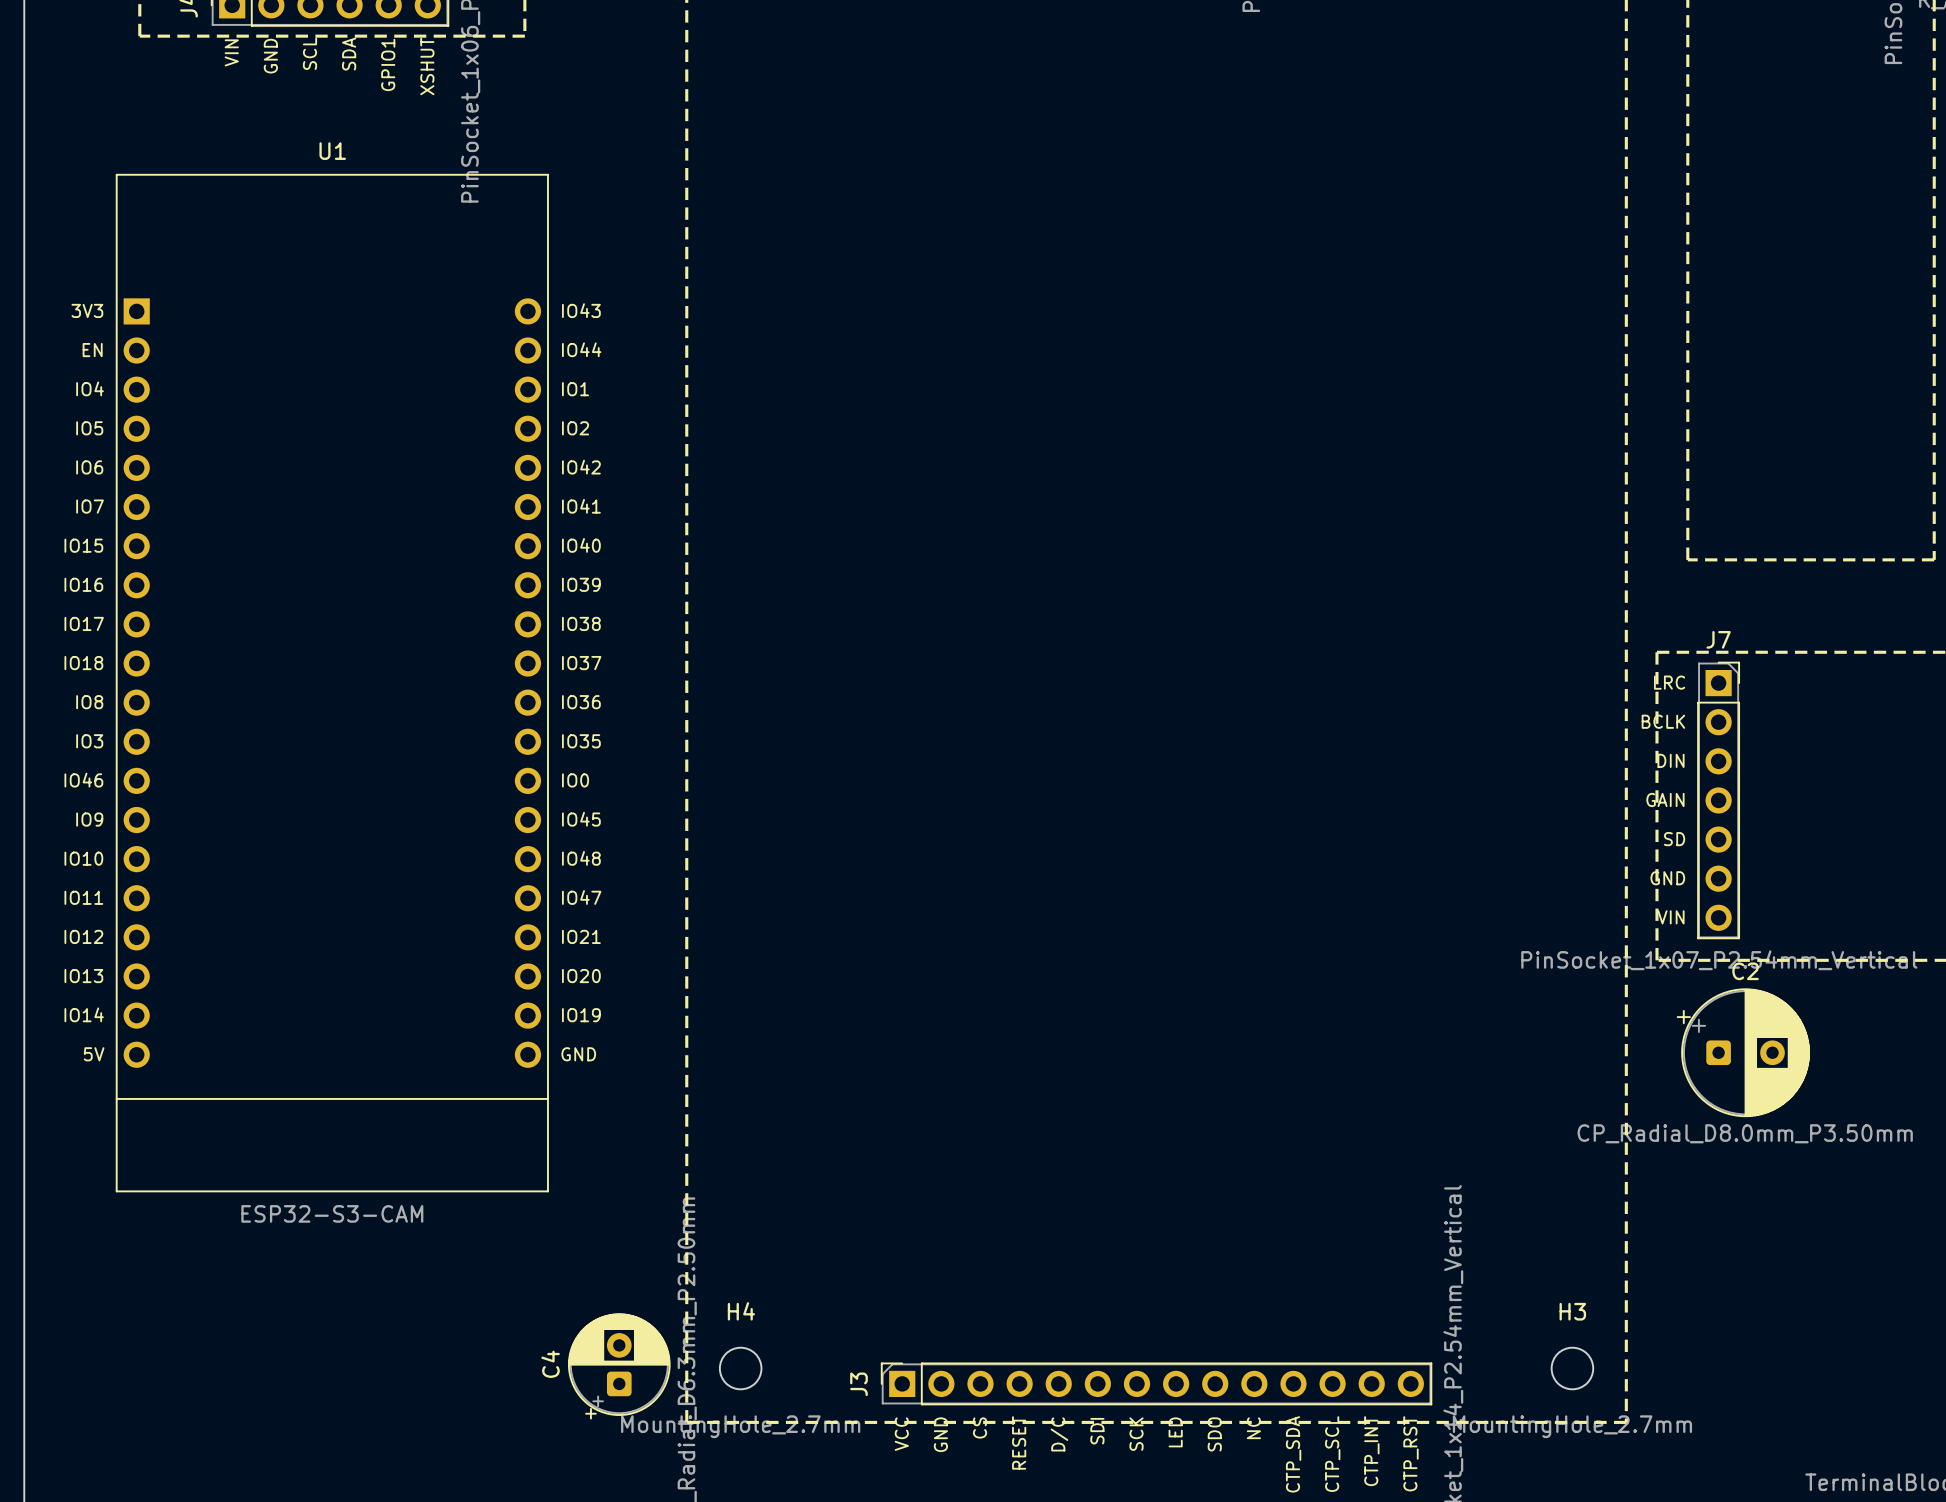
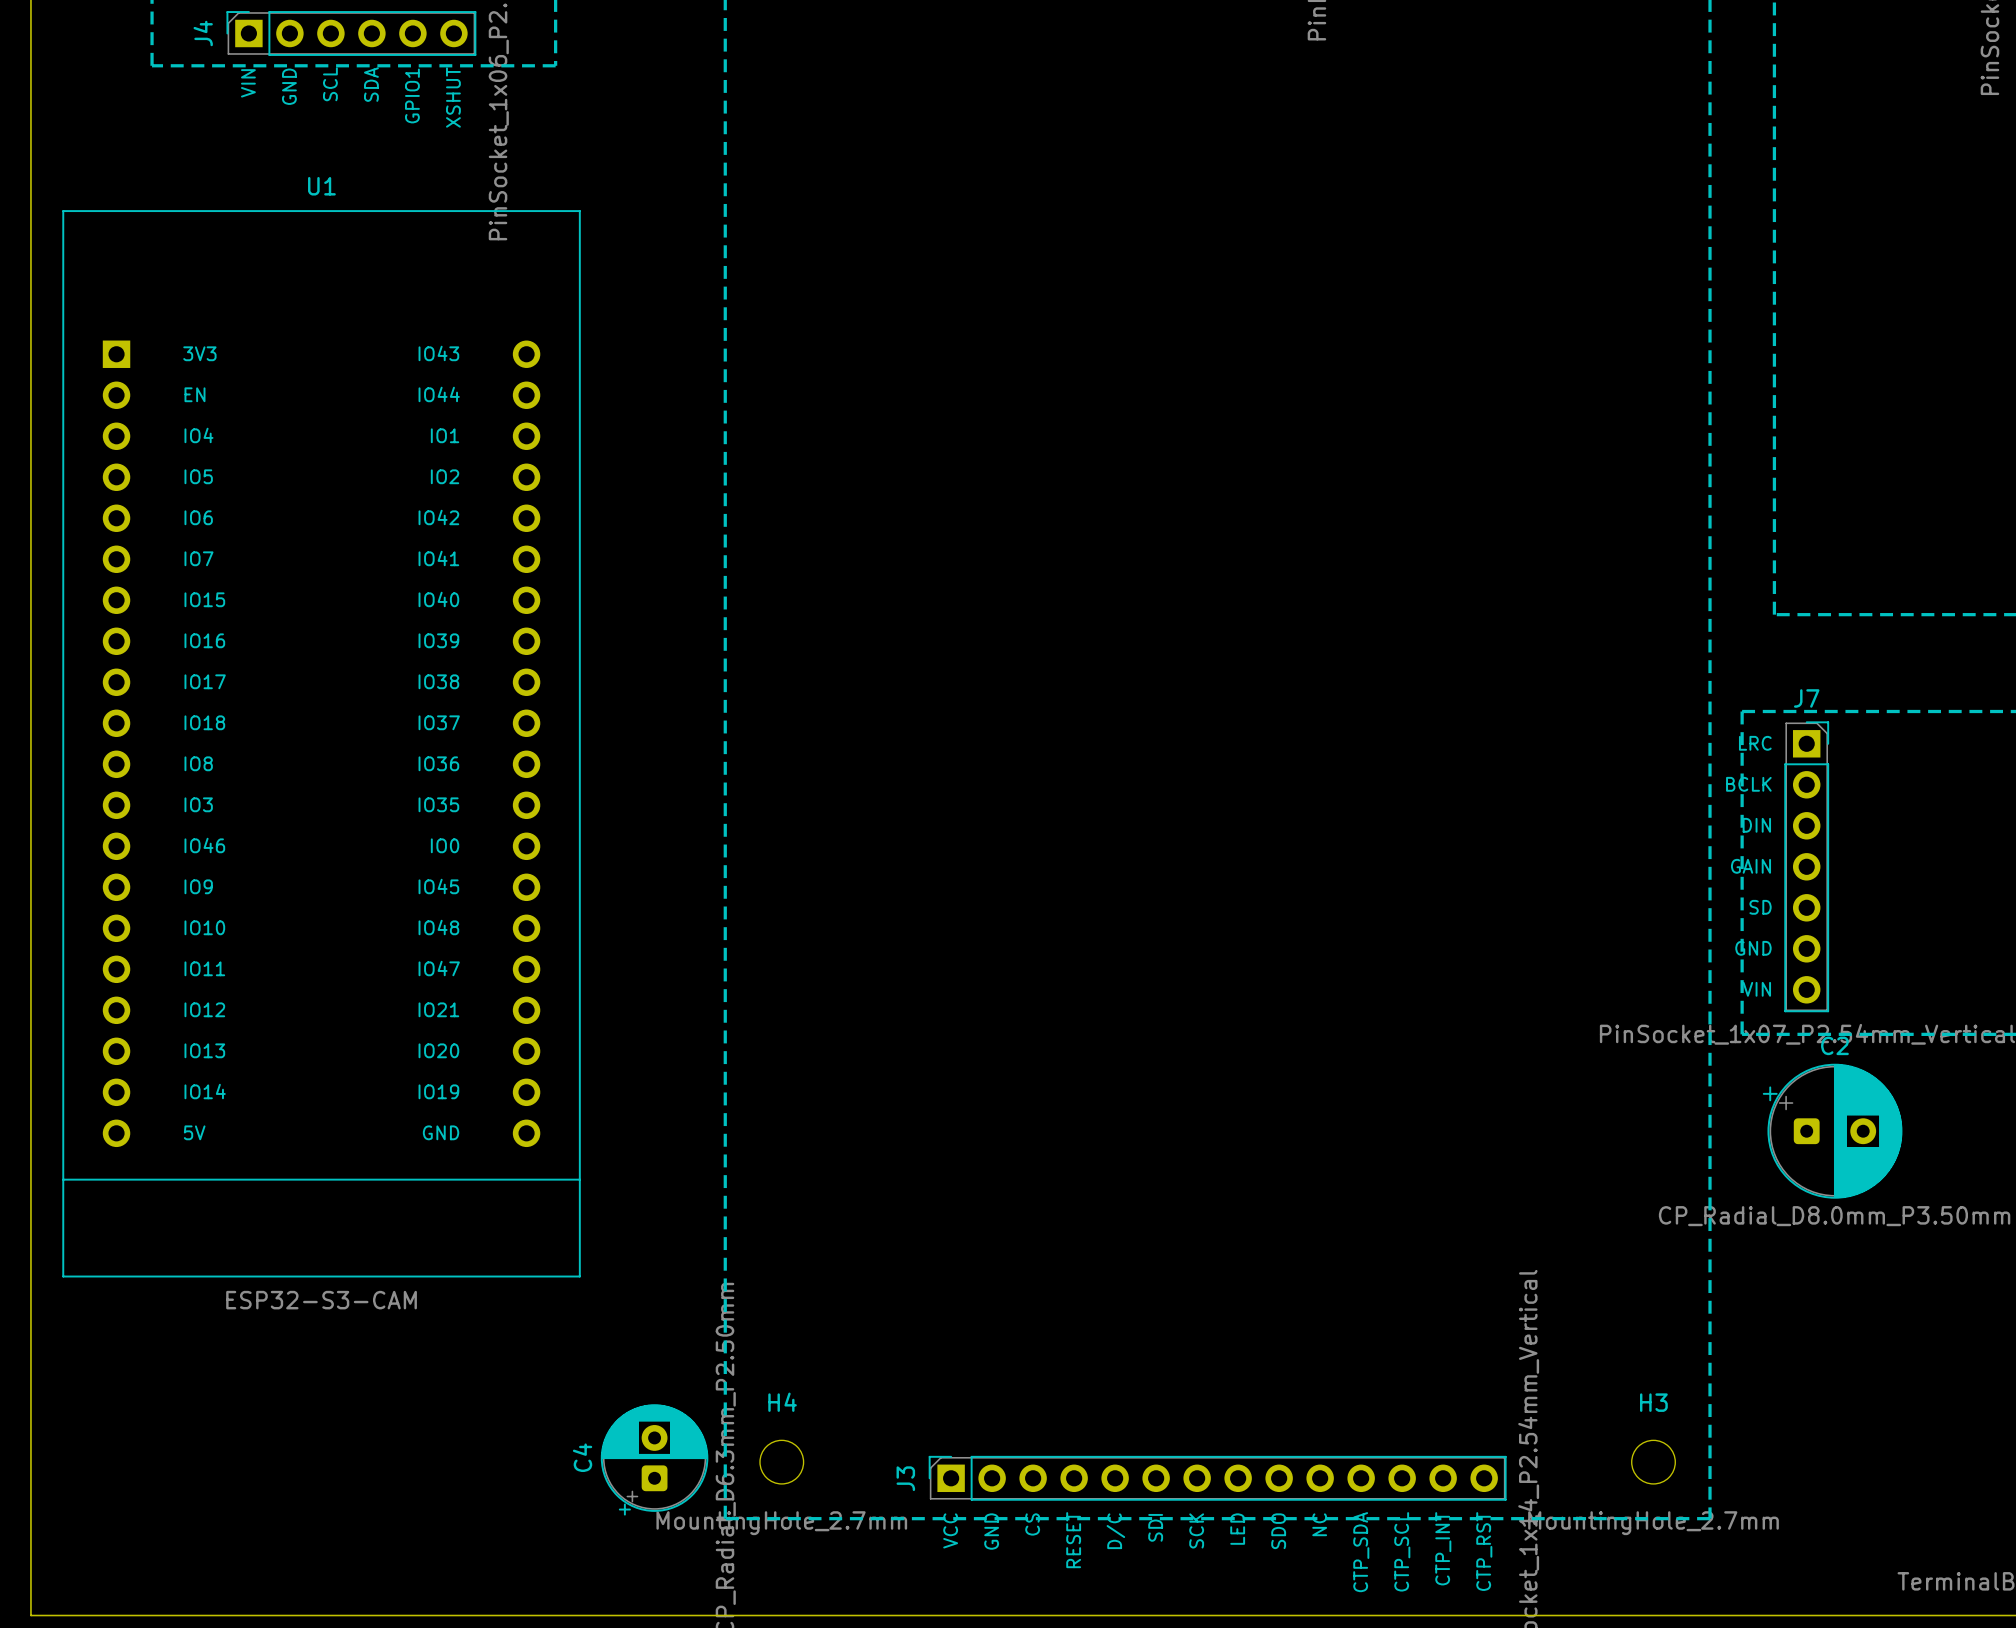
U1 footprint: [115, 173, 549, 1193] -> [62, 210, 581, 1278]
text position: 3V3 (87, 310) -> 3V3 (199, 353)
text position: IO43 (581, 310) -> IO43 (438, 353)
text position: IO44 (581, 349) -> IO44 (439, 394)
text position: EN (92, 350) -> EN (194, 394)
text position: IO4 (90, 388) -> IO4 (198, 435)
text position: IO1 (575, 389) -> IO1 (445, 435)
text position: IO5 (89, 428) -> IO5 (198, 476)
text position: IO2 (575, 428) -> IO2 (445, 476)
text position: IO6 (89, 467) -> IO6 (198, 517)
text position: IO42 (581, 467) -> IO42 (438, 517)
text position: IO7 (90, 506) -> IO7 (198, 558)
text position: IO41 (581, 506) -> IO41 (438, 558)
text position: IO15 (83, 545) -> IO15 (204, 599)
text position: IO40 (581, 545) -> IO40 (438, 599)
text position: IO16 (83, 584) -> IO16 (204, 640)
text position: IO39 (581, 584) -> IO39 (438, 640)
text position: IO17 (84, 623) -> IO17 (205, 681)
text position: IO38 (581, 623) -> IO38 (438, 681)
text position: IO18 (83, 663) -> IO18 (204, 722)
text position: IO37 (581, 663) -> IO37 (439, 722)
text position: IO8 (89, 702) -> IO8 (198, 763)
text position: IO36 (581, 702) -> IO36 (438, 763)
text position: IO3 (89, 741) -> IO3 (198, 804)
text position: IO35 (581, 741) -> IO35 (438, 804)
text position: IO46 (83, 780) -> IO46 (204, 845)
text position: IO0 (575, 780) -> IO0 (445, 845)
text position: IO9 (89, 819) -> IO9 (198, 886)
text position: IO45 (581, 819) -> IO45 (438, 886)
text position: IO10 (83, 858) -> IO10 (204, 927)
text position: IO48 (581, 858) -> IO48 (438, 927)
text position: IO11 (83, 897) -> IO11 (204, 968)
text position: IO47 (581, 897) -> IO47 (439, 968)
text position: IO12 (83, 936) -> IO12 (204, 1009)
text position: IO21 (581, 936) -> IO21 (438, 1009)
text position: IO13 (83, 976) -> IO13 (204, 1050)
text position: IO20 (581, 976) -> IO20 (438, 1050)
text position: IO14 (84, 1014) -> IO14 (205, 1091)
text position: IO19 (581, 1015) -> IO19 (438, 1091)
text position: 5V (94, 1054) -> 5V (194, 1132)
text position: GND (578, 1054) -> GND (441, 1132)

